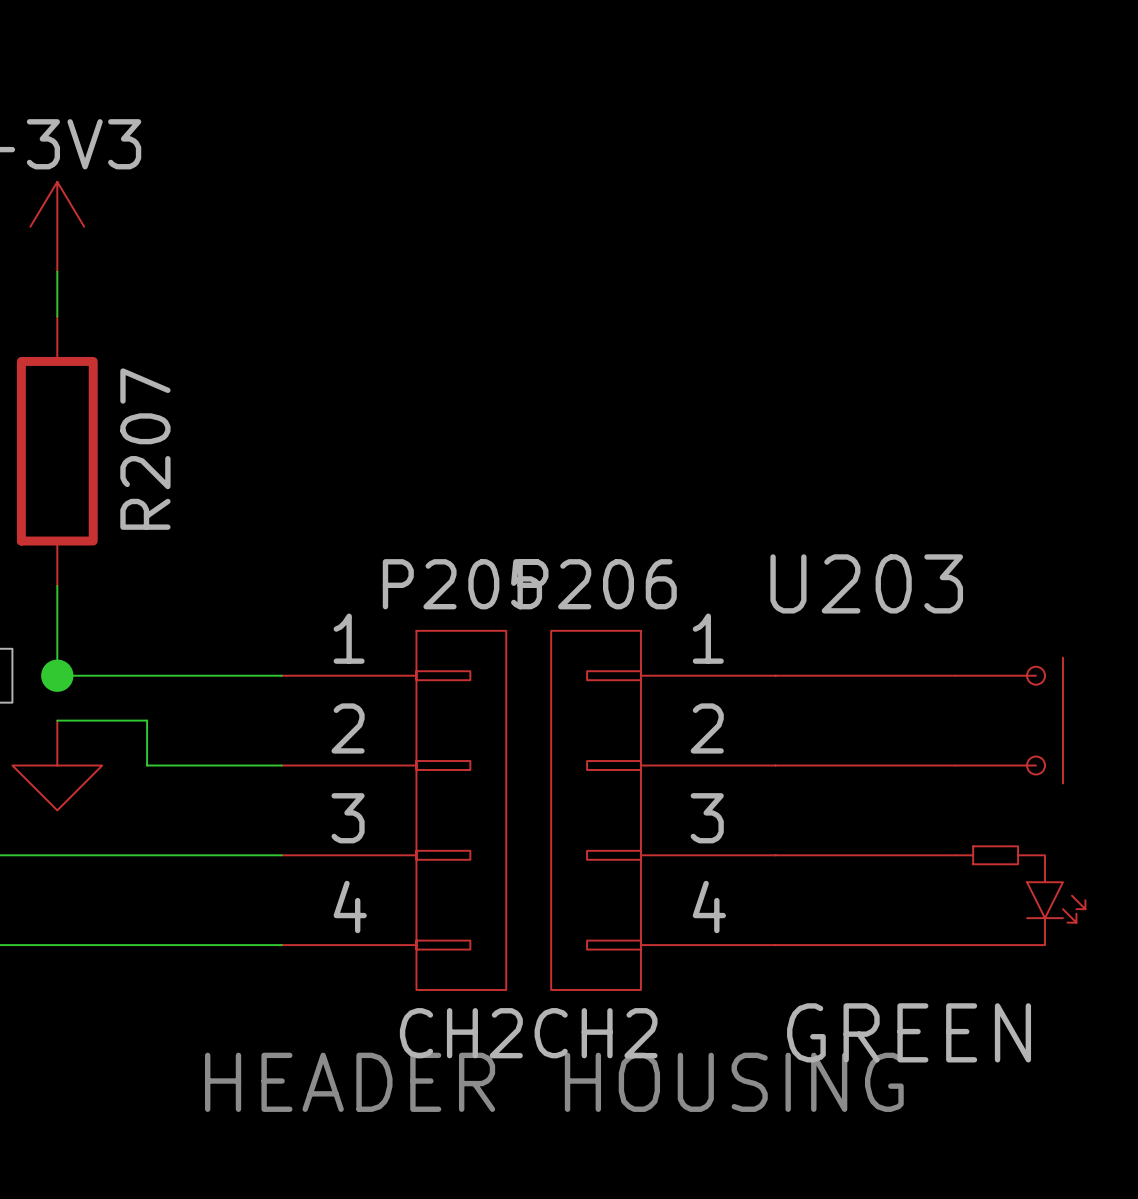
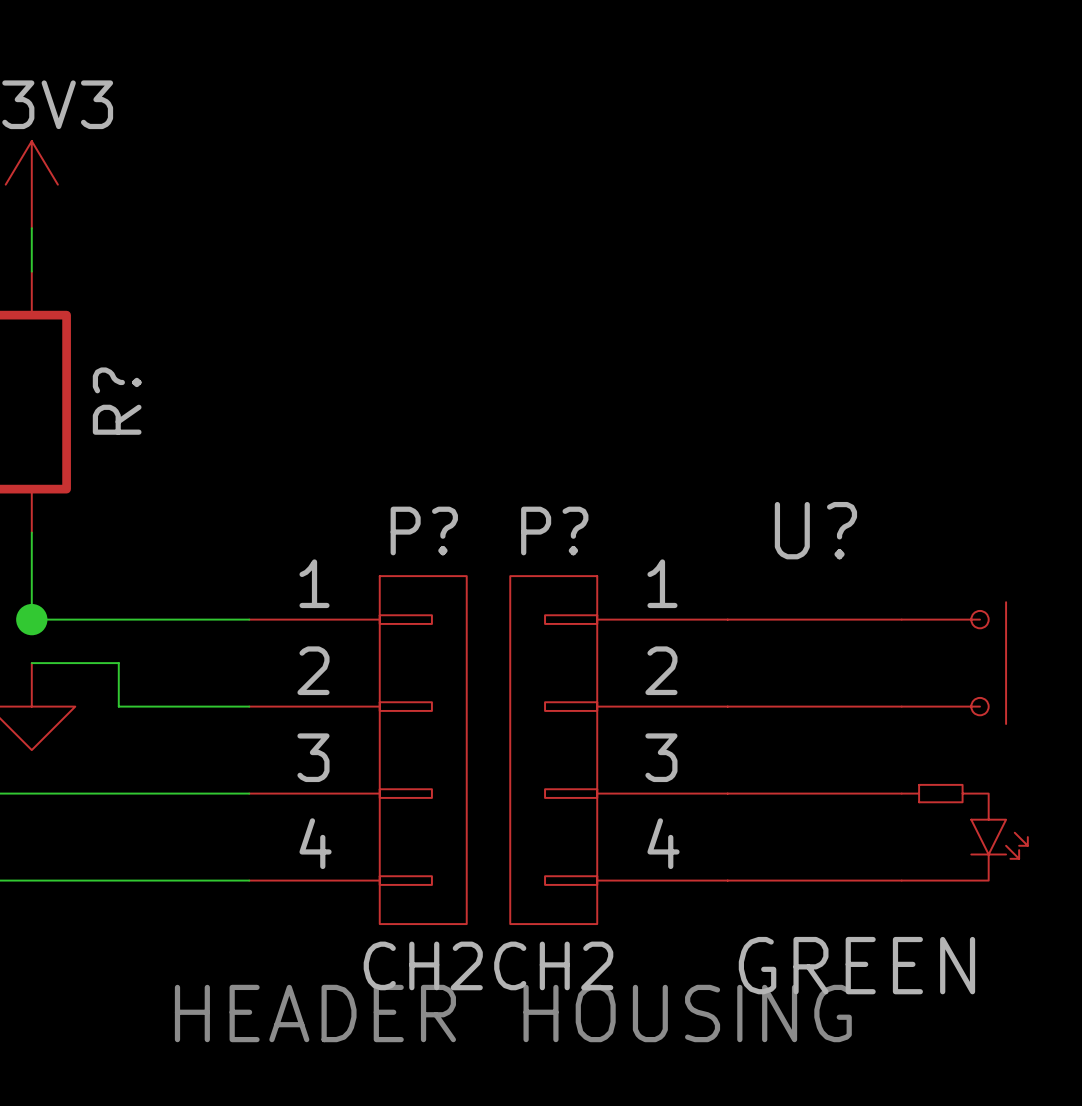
R207 name: R207 (145, 449) -> R? (117, 401)
U203 name: U203 (866, 583) -> U? (815, 530)
P205 name: P205 (462, 584) -> P? (424, 530)
P206 name: P206 (597, 584) -> P? (554, 530)

